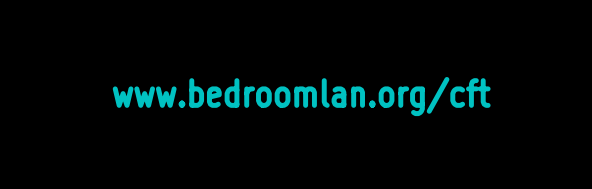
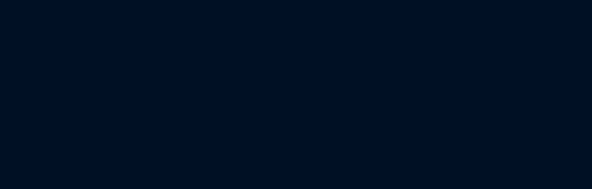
text: www.bedroomlan.org/cft (301, 96) -> none

